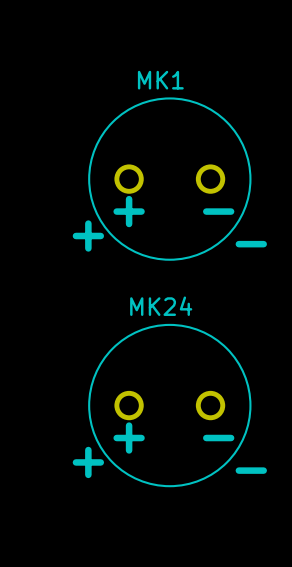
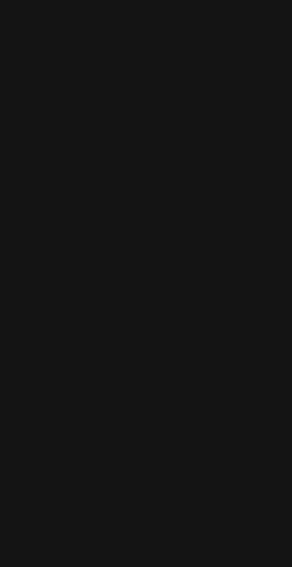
MK1: (169, 179) -> none
MK24: (169, 405) -> none

